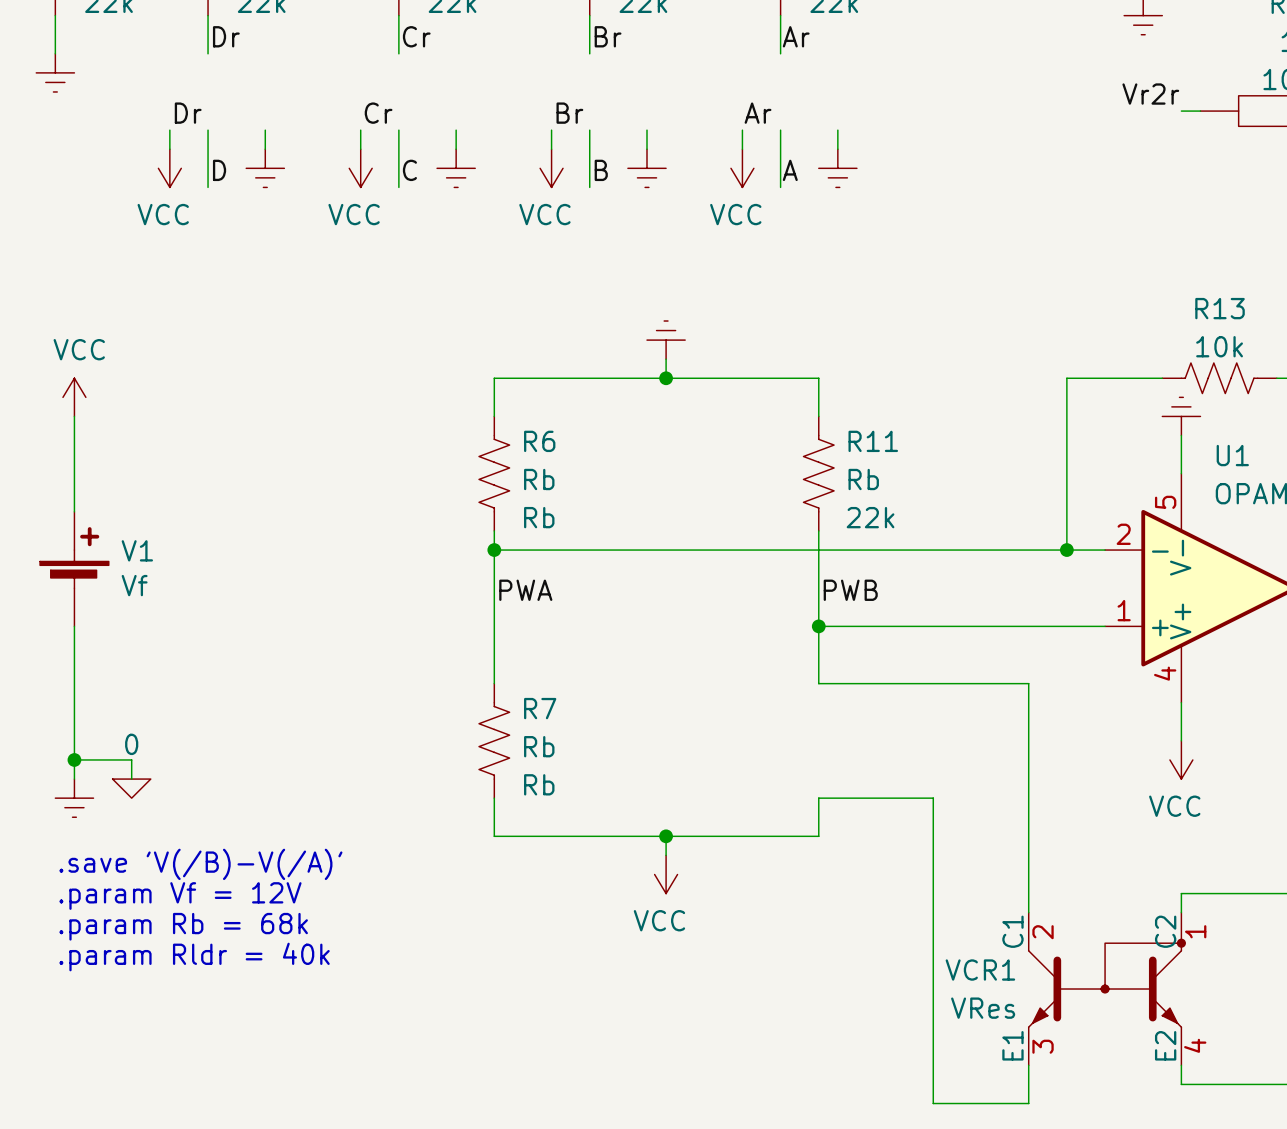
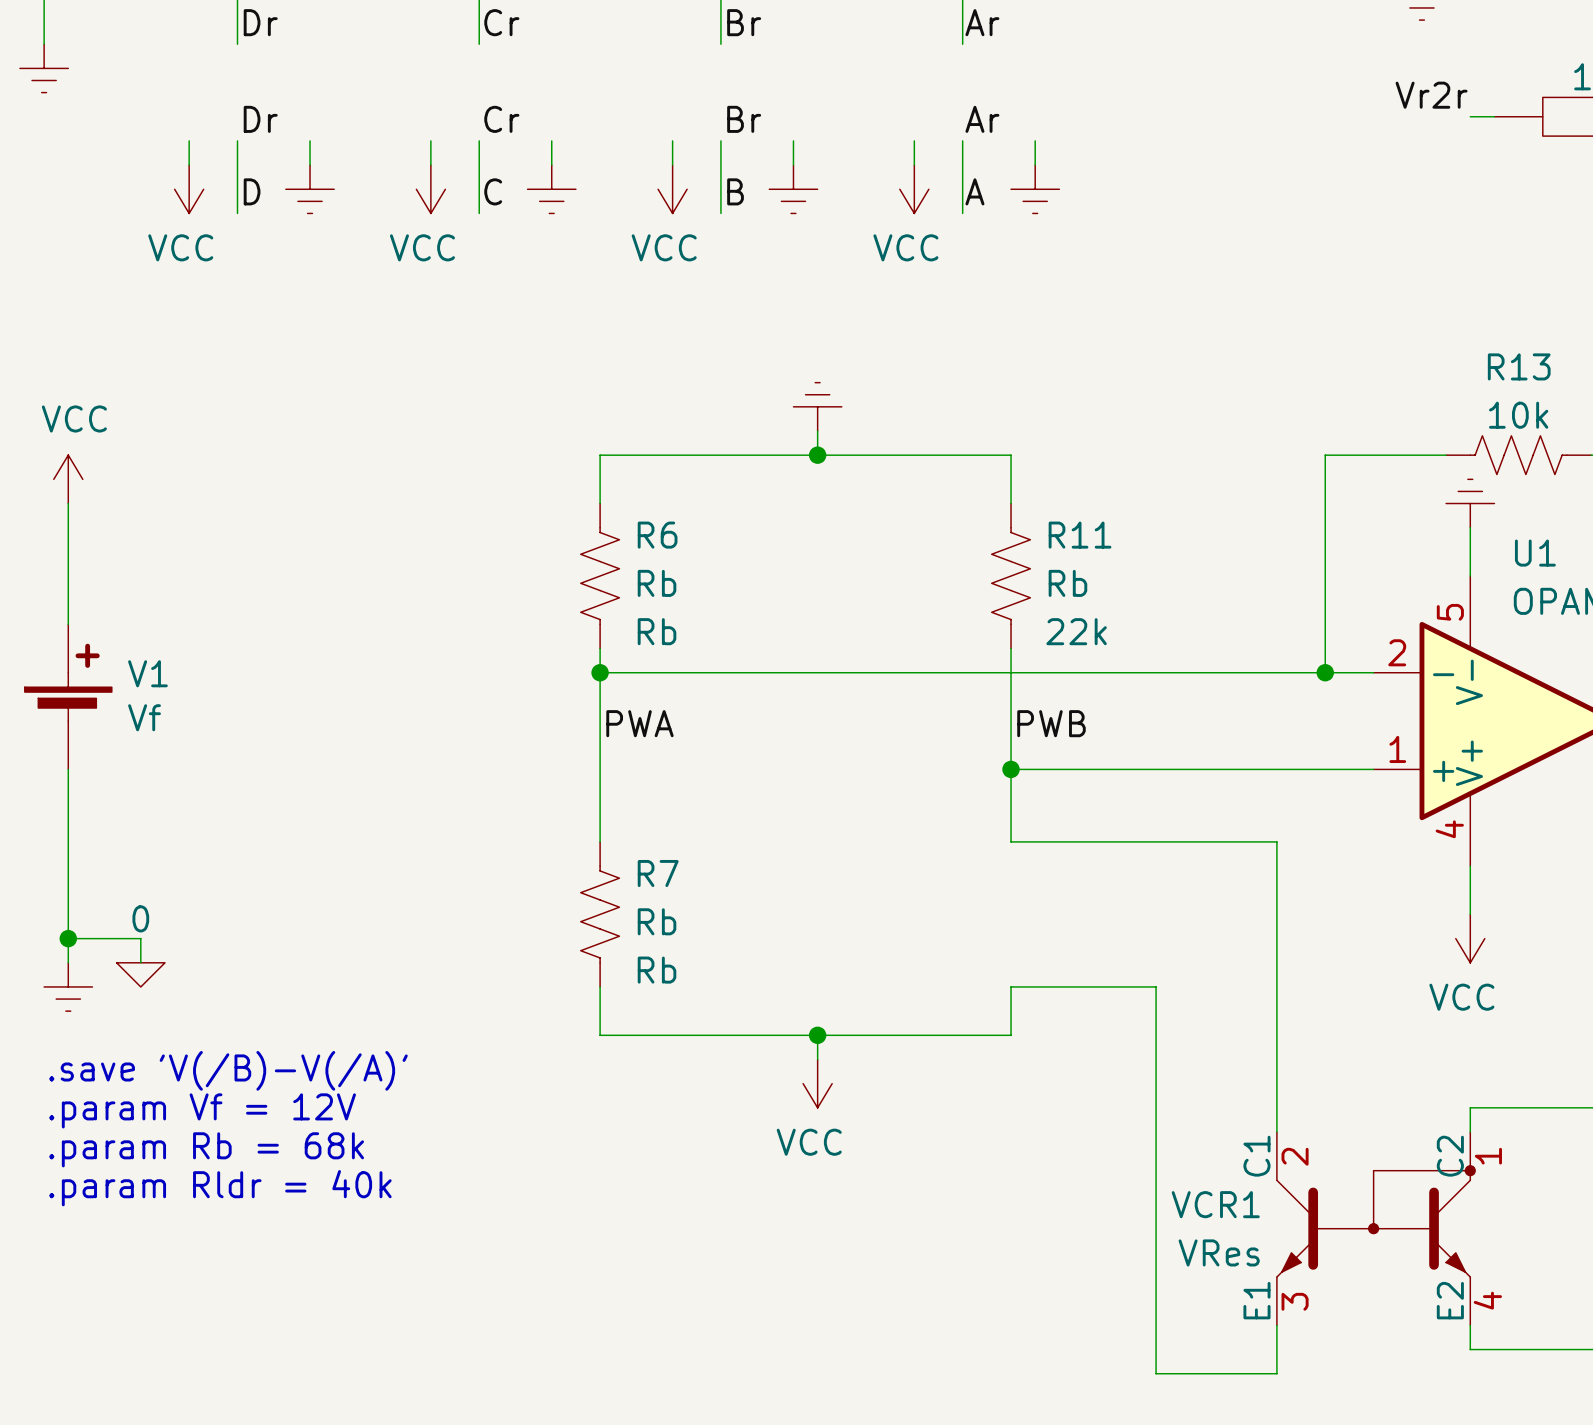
label position: Dr (188, 113) -> Dr (260, 119)
label position: Cr (378, 113) -> Cr (501, 119)
label position: Br (569, 113) -> Br (744, 119)
label position: Ar (758, 113) -> Ar (982, 119)

